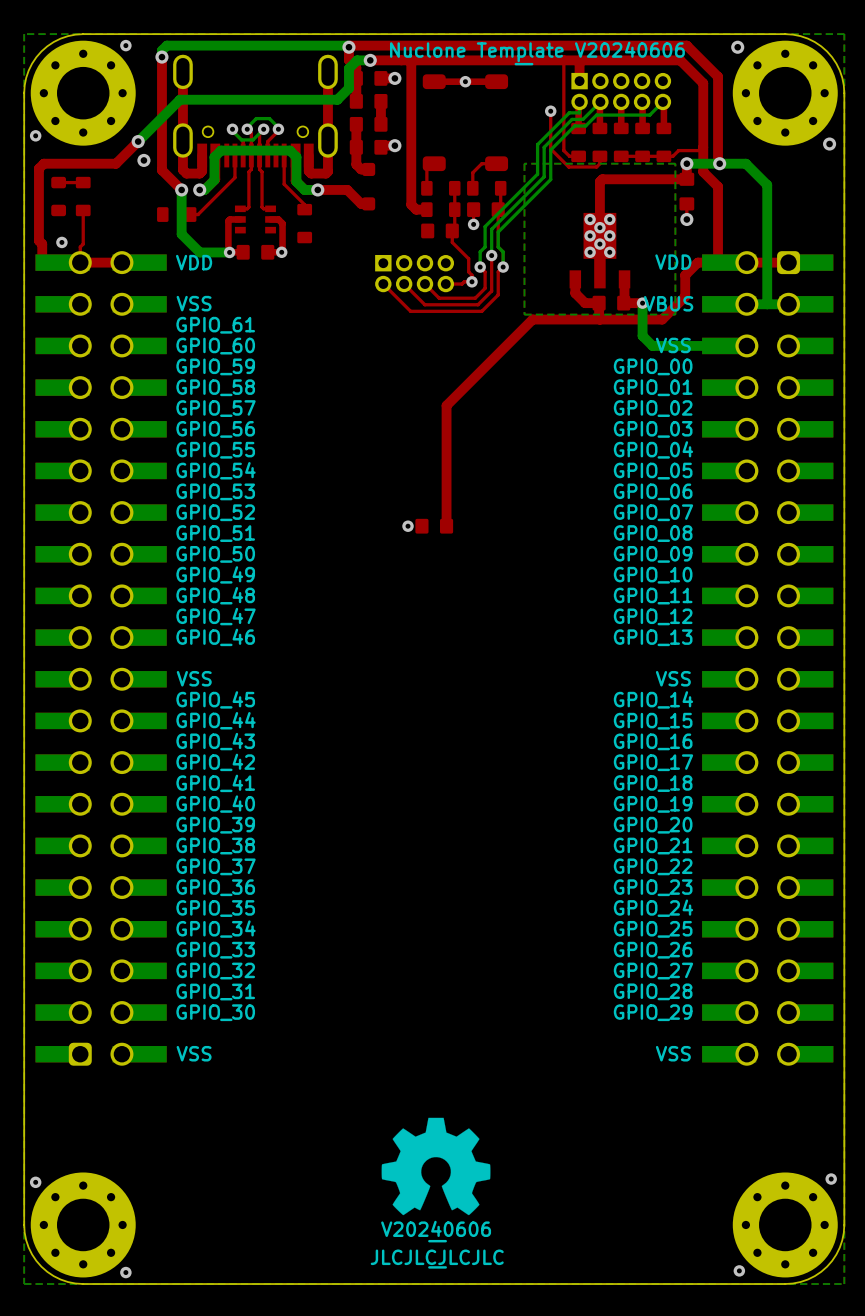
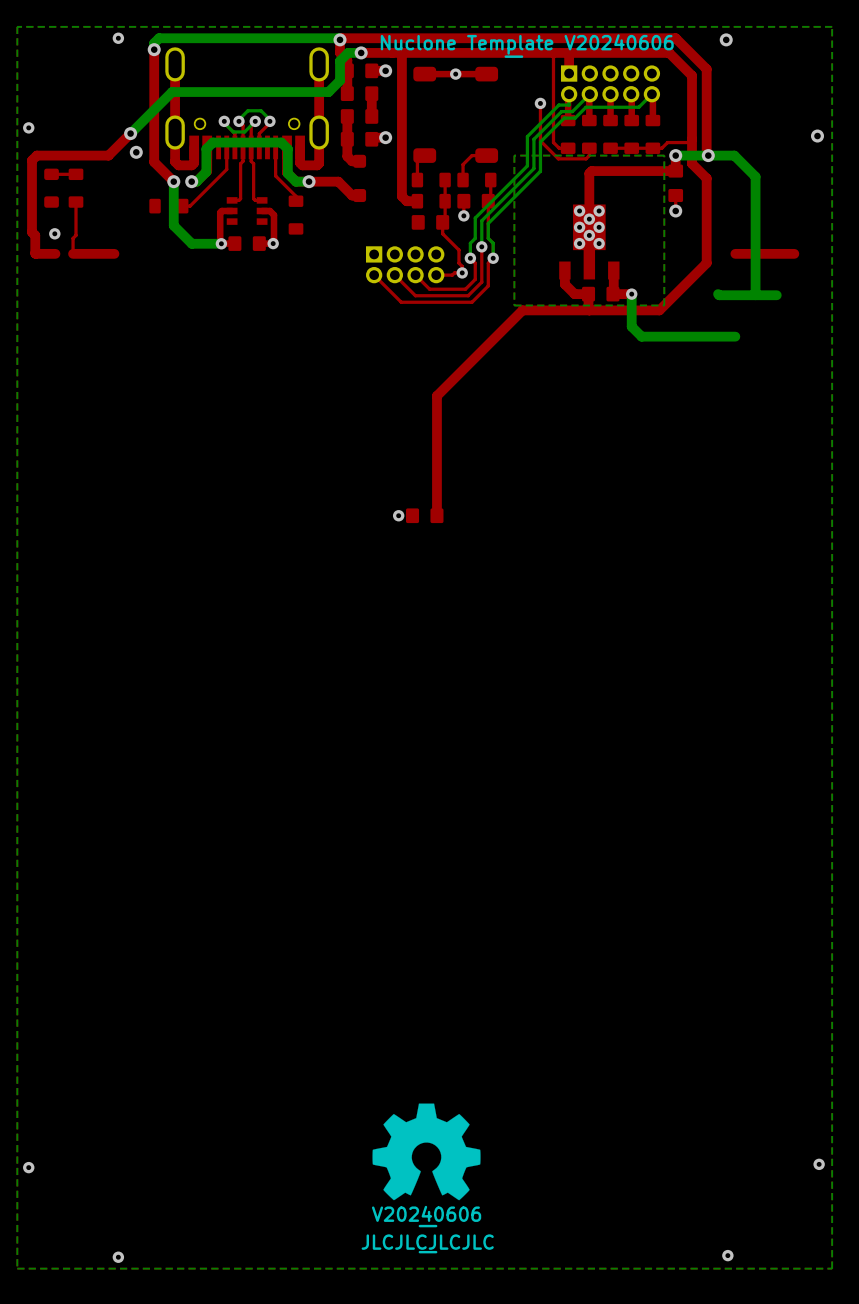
board edge: (785, 34) (83, 34) (67, 36) (53, 42) (41, 51) (32, 63) (26, 77) (24, 93) (24, 1224) (26, 1240) (32, 1254) (41, 1266) (53, 1276) (67, 1282) (83, 1284) (785, 1284) (800, 1282) (814, 1276) (827, 1266) (836, 1254) (842, 1240) (844, 1224) (844, 93) (839, 70) (827, 51) (807, 38) (785, 34) -> none
part: (83, 93) -> none
part: (785, 93) -> none
top track: (729, 262) (697, 262) (685, 275) (685, 296) (662, 319) -> (706, 253) (706, 263) (659, 310) (651, 310)
part: (101, 658) -> none
part: (767, 658) -> none
part: (83, 1224) -> none
part: (785, 1224) -> none

